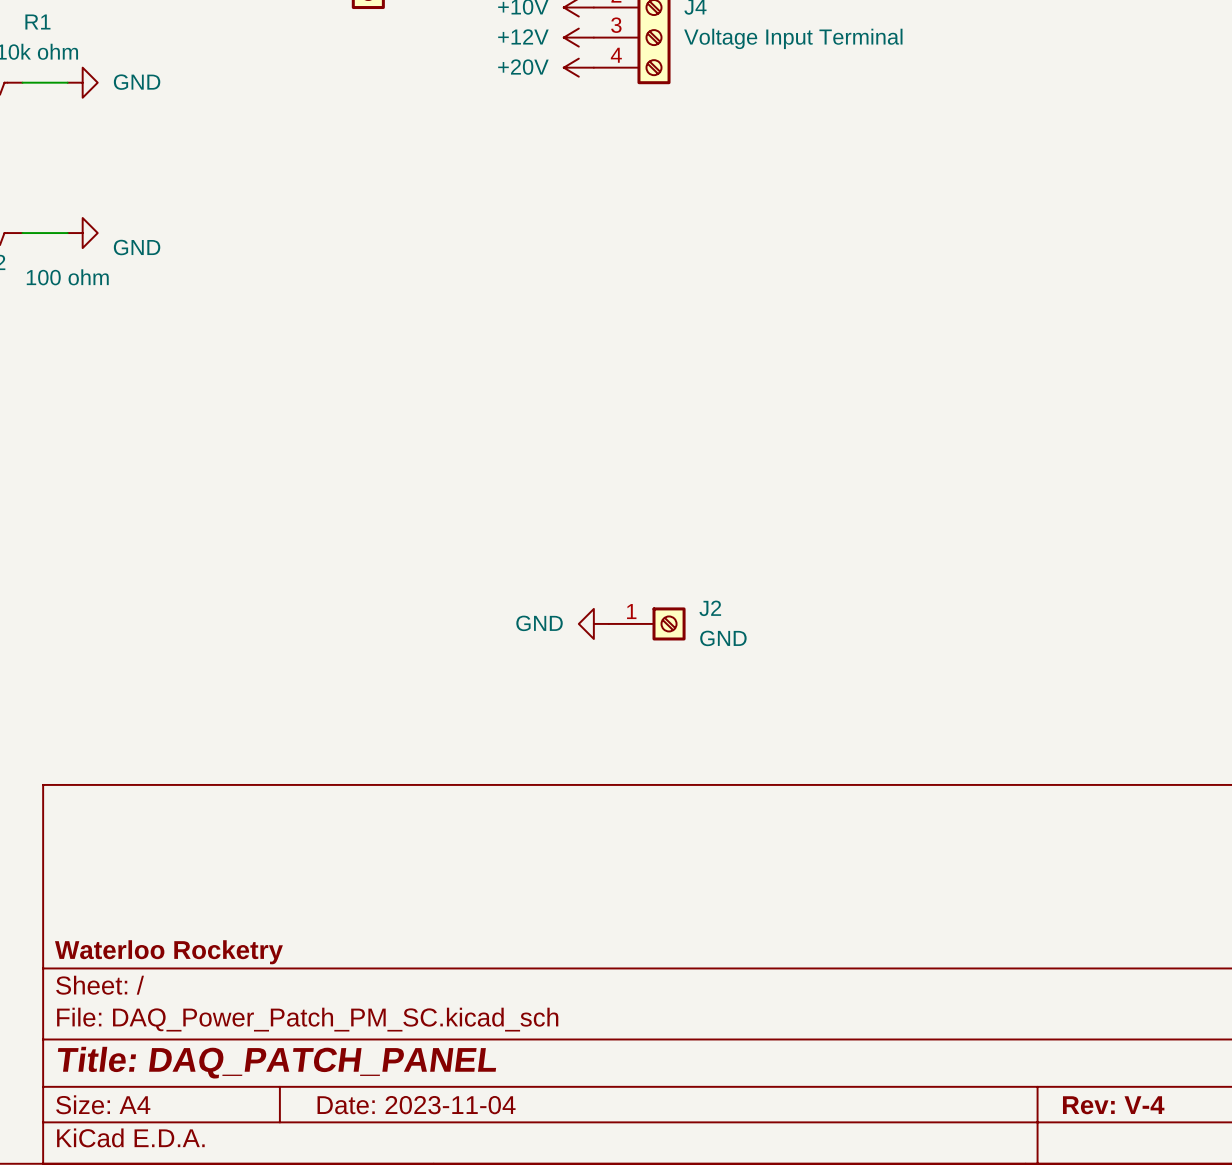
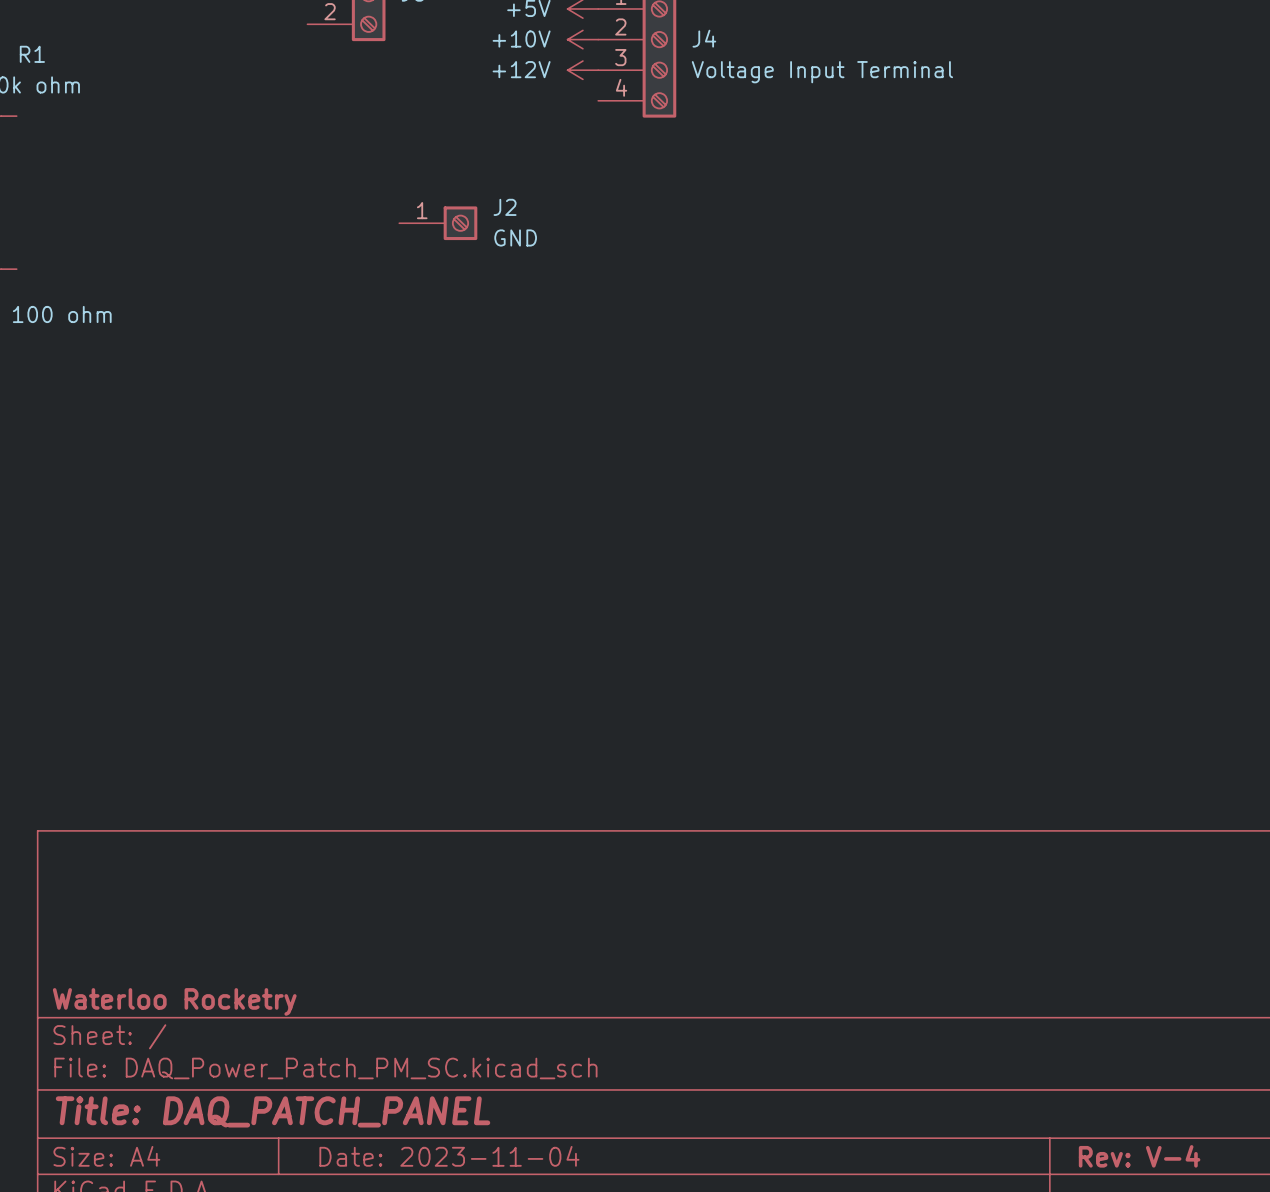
power symbol: +20V (578, 67) -> none
wire: (22, 82) (67, 82) -> none
power symbol: GND (82, 82) -> none
wire: (22, 233) (67, 233) -> none
power symbol: GND (82, 233) -> none
power symbol: GND (593, 623) -> none
J2 position: (647, 623) -> (438, 223)

